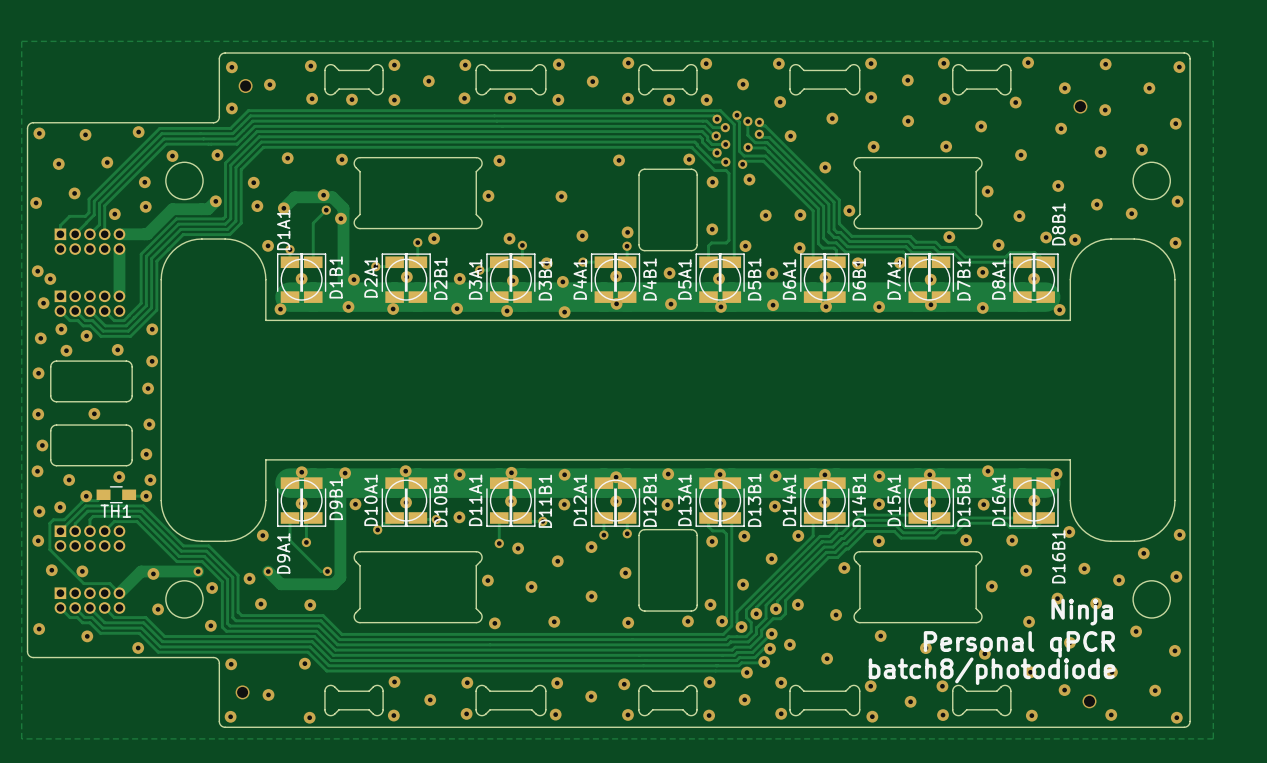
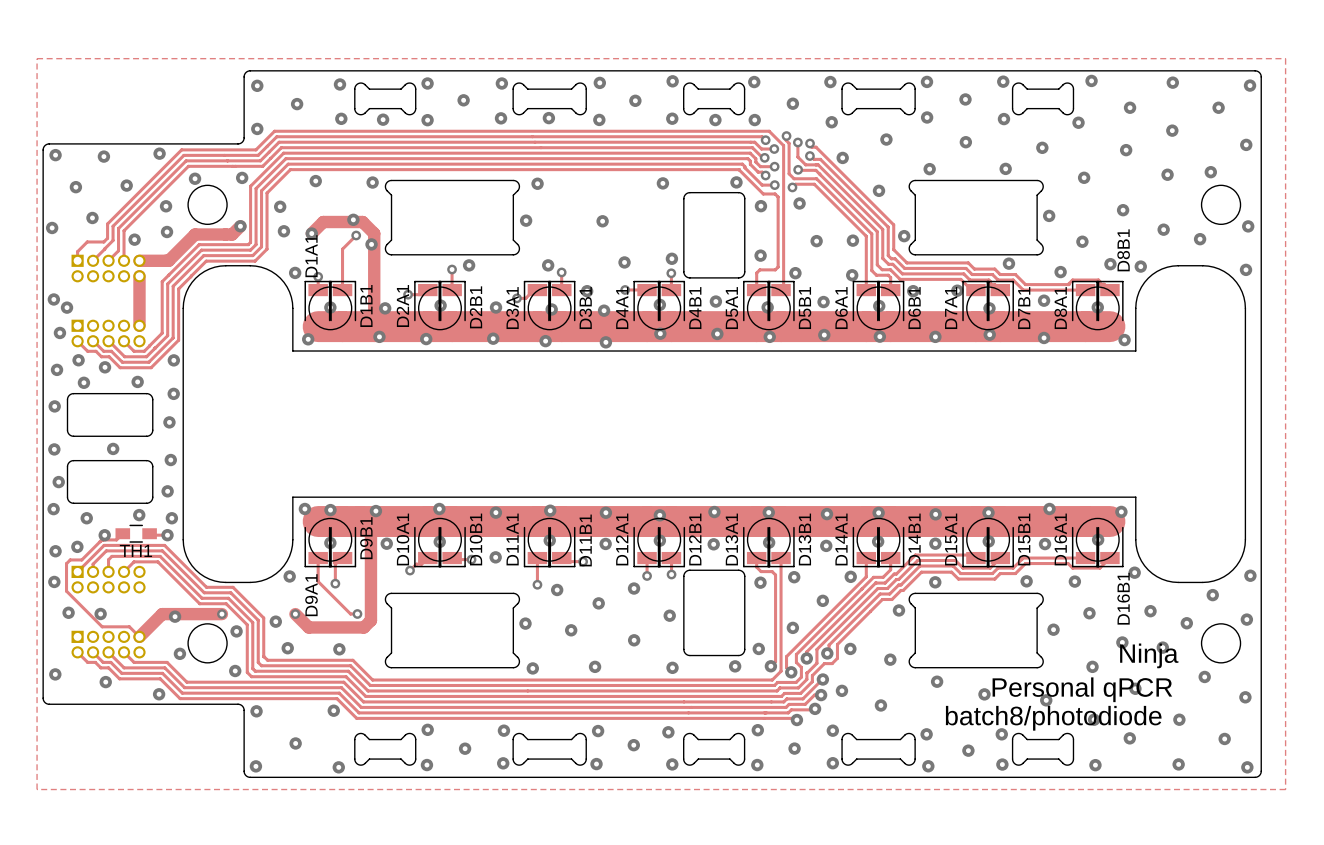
via: (245, 86) -> none
via: (1080, 106) -> none
via: none -> (304, 508)
via: (242, 692) -> none
via: (1089, 701) -> none

